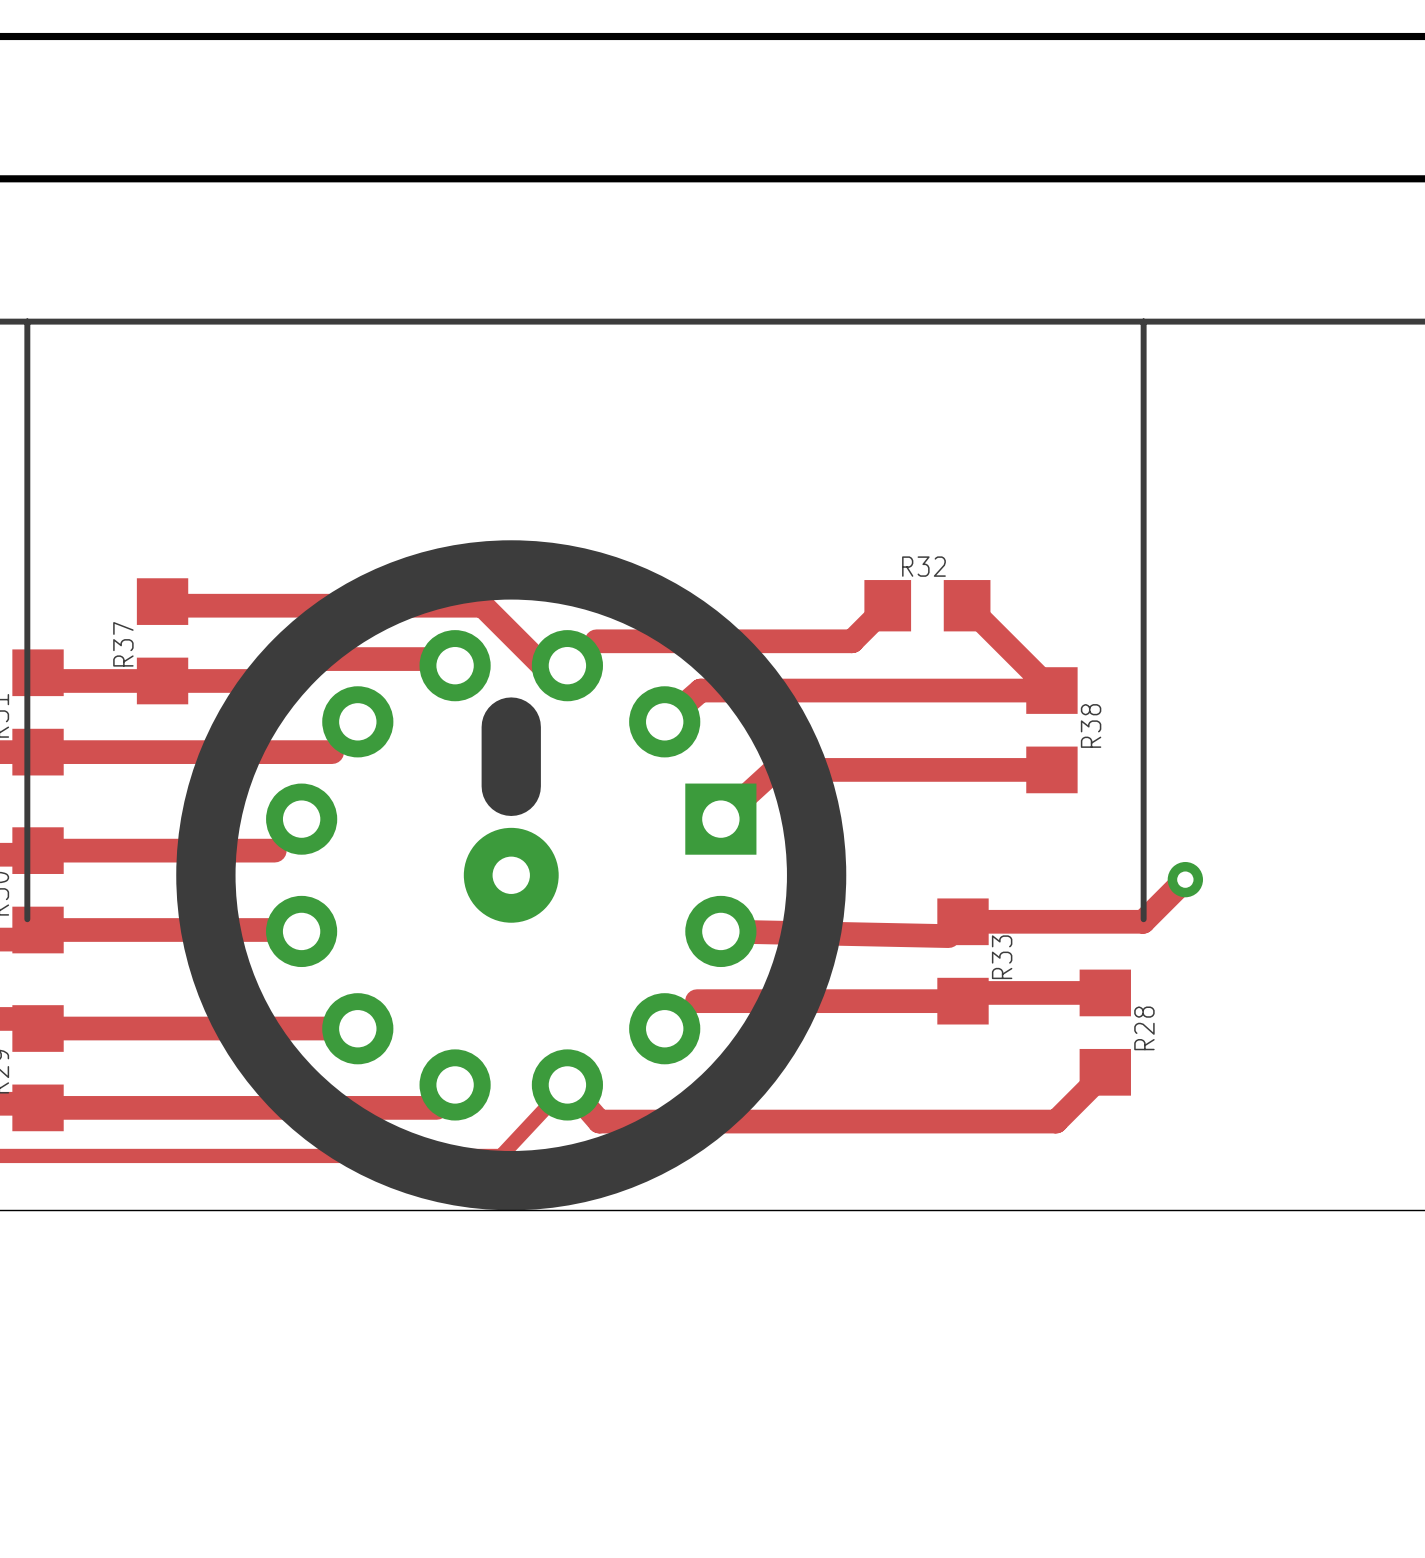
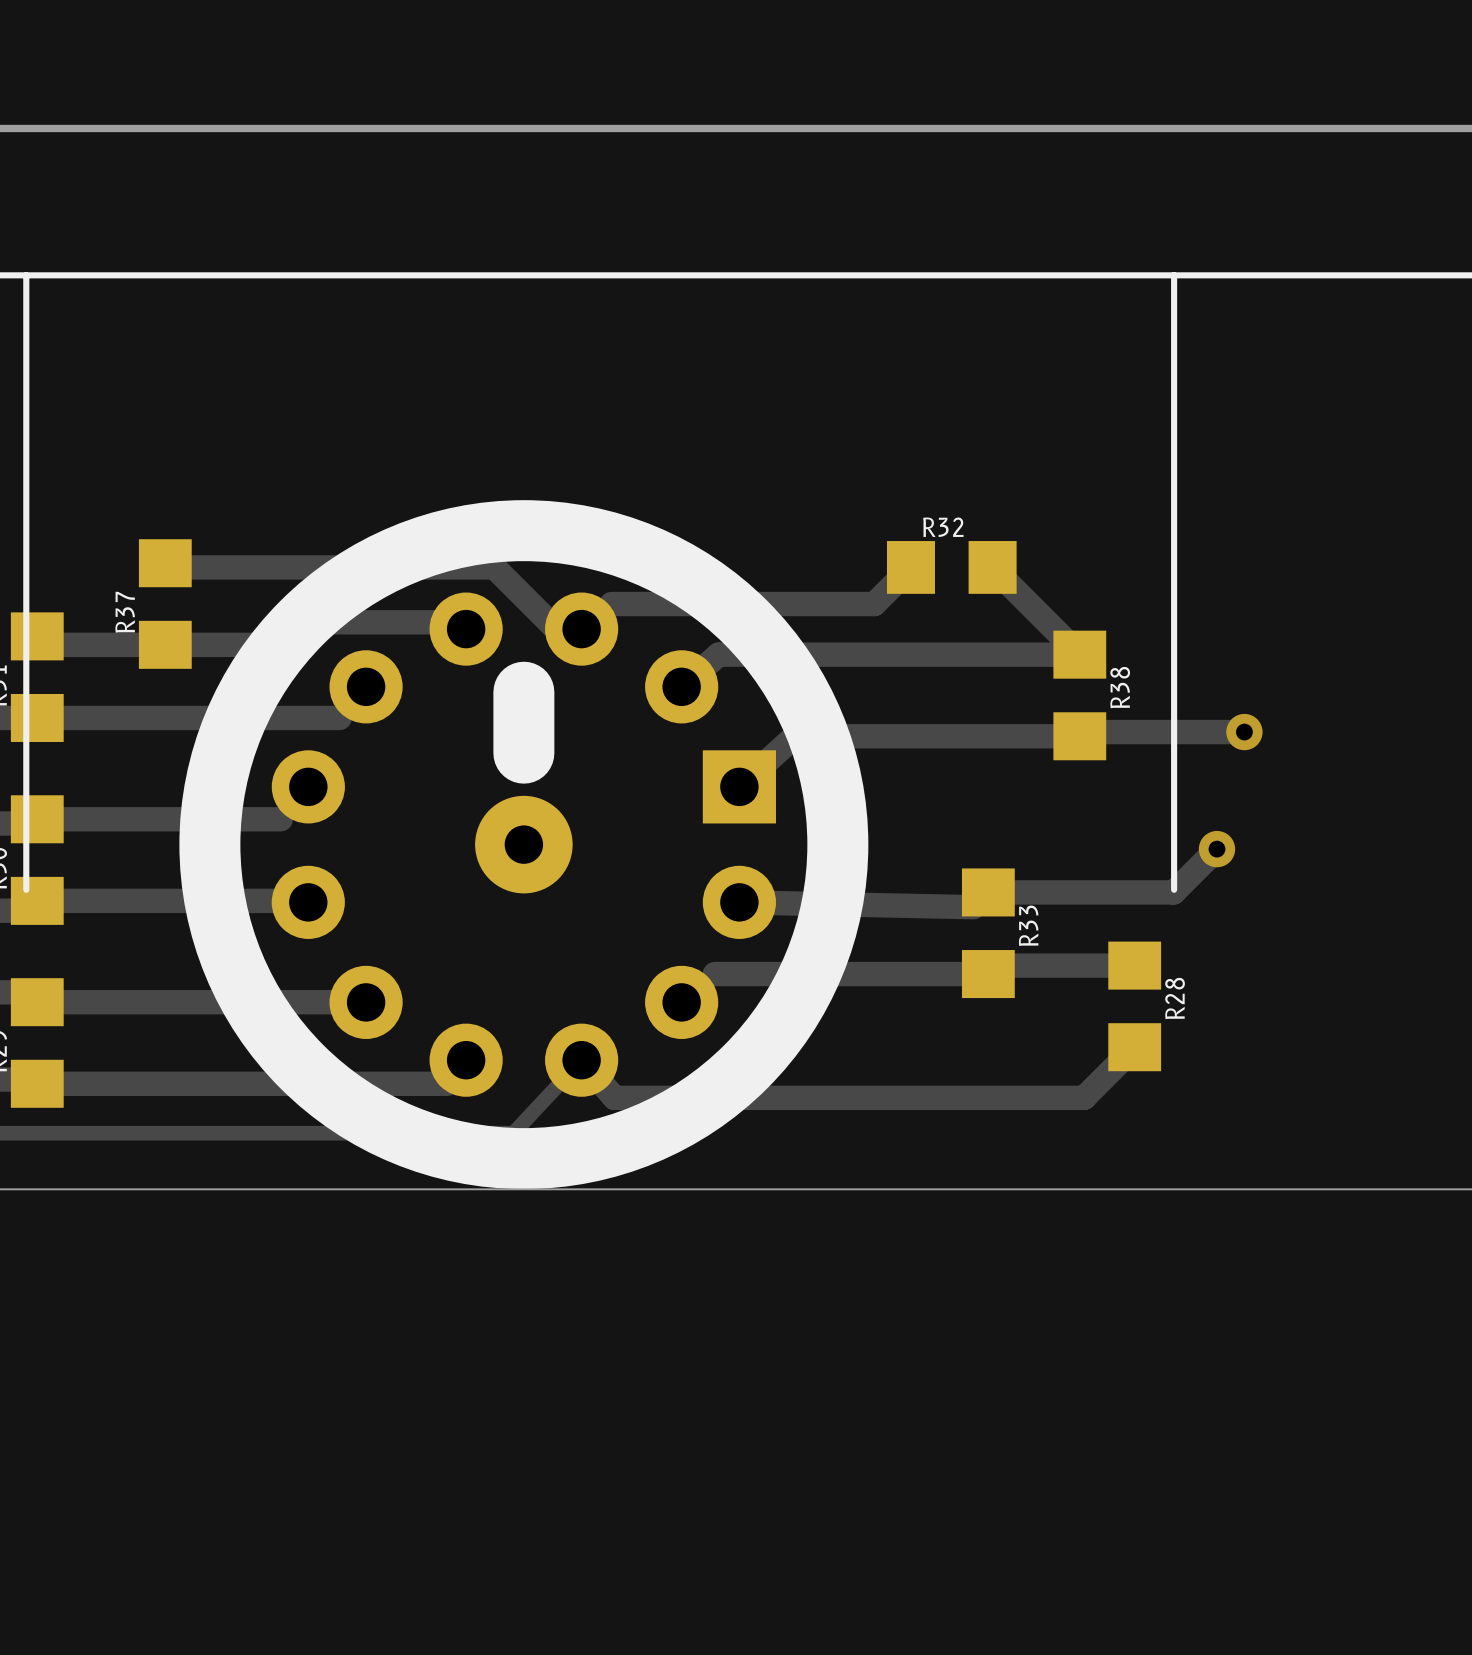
track: none -> (1244, 732) (1084, 732) (1079, 736)
via: none -> (1244, 732)

